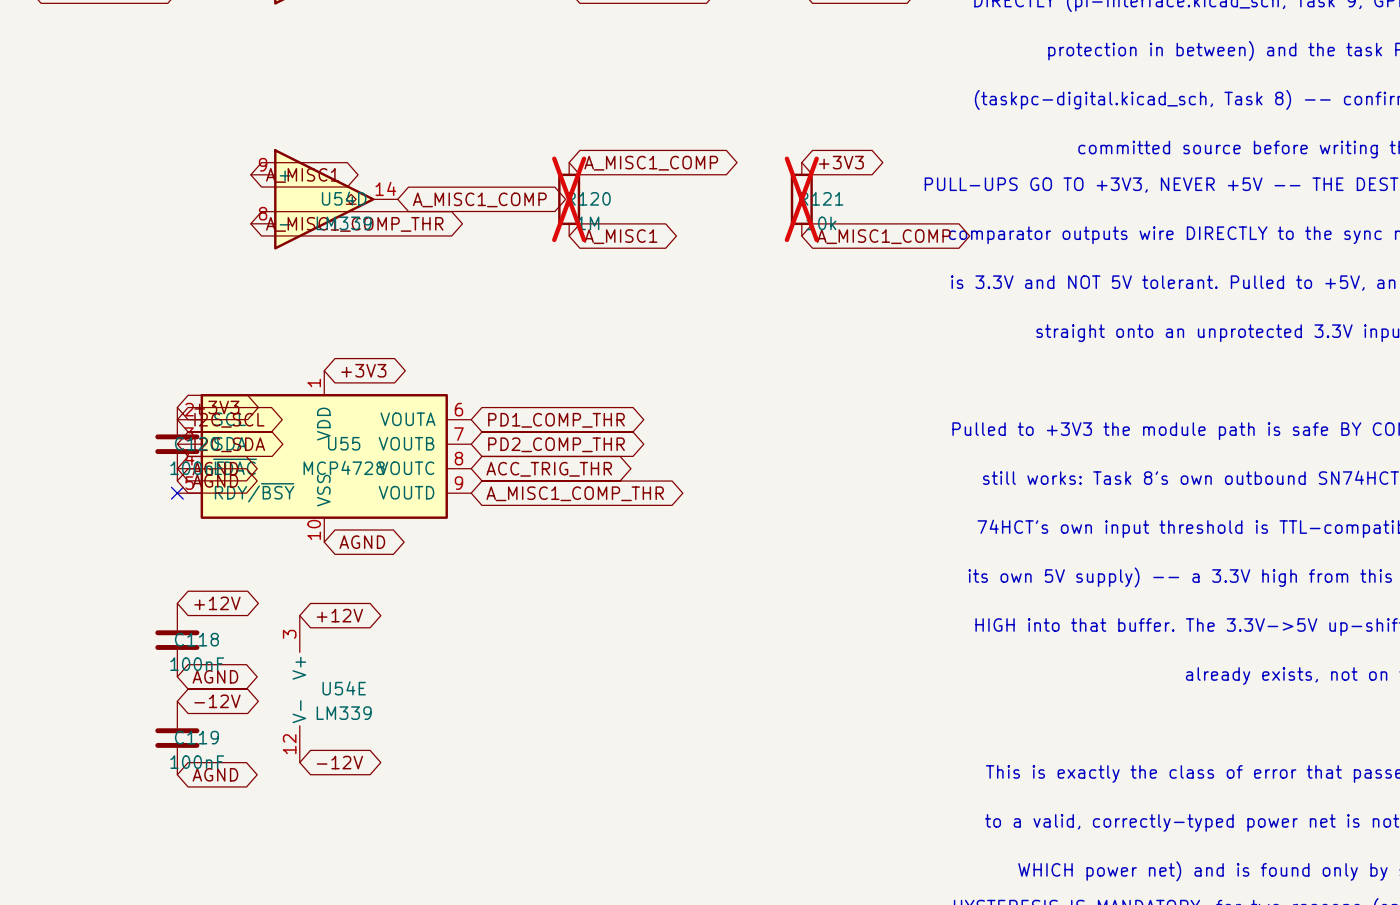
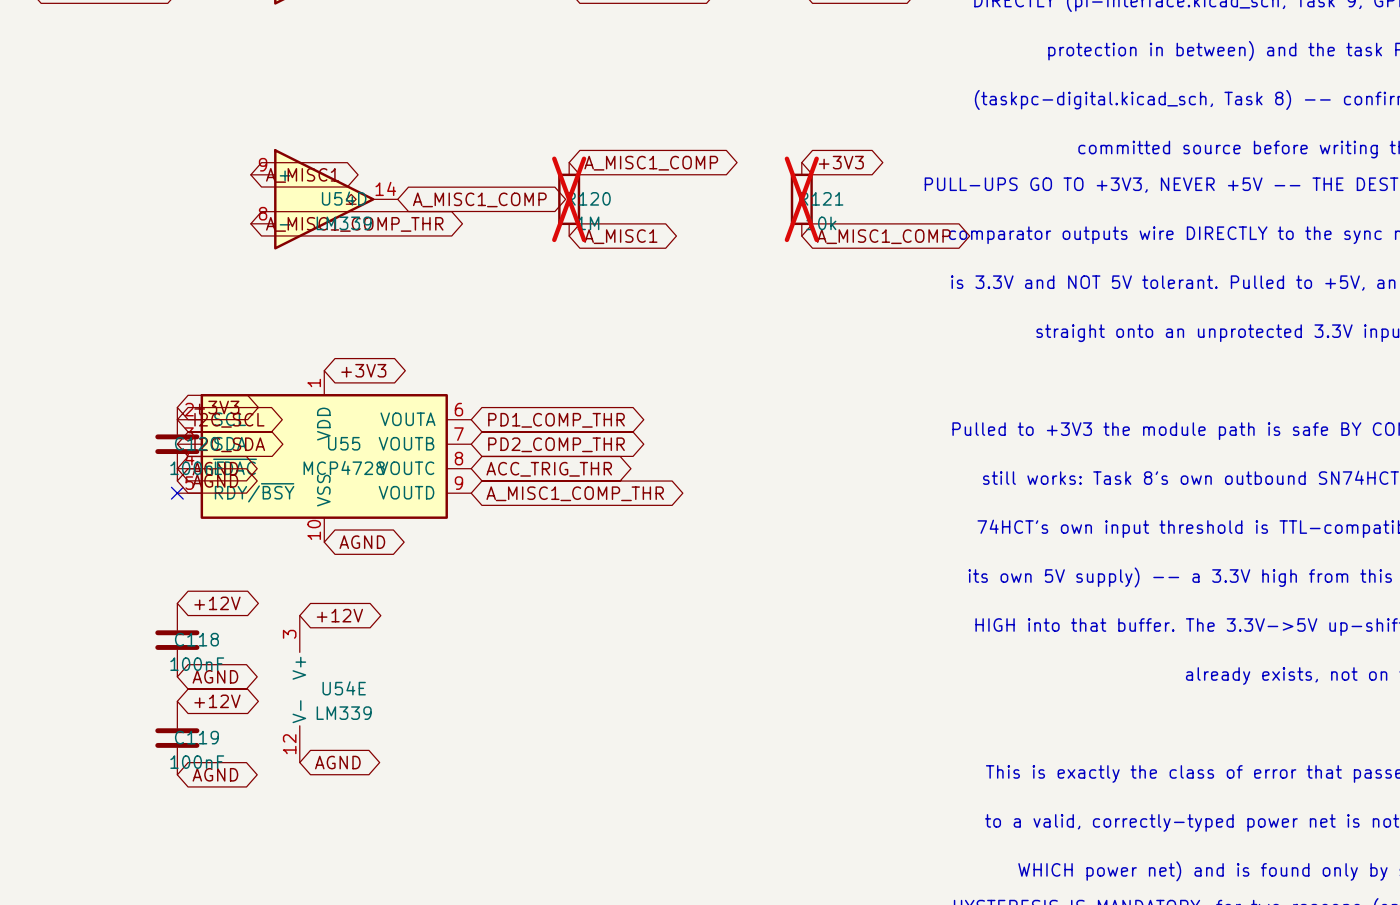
global label: -12V (217, 701) -> +12V (217, 701)
global label: -12V (339, 762) -> AGND (337, 762)

